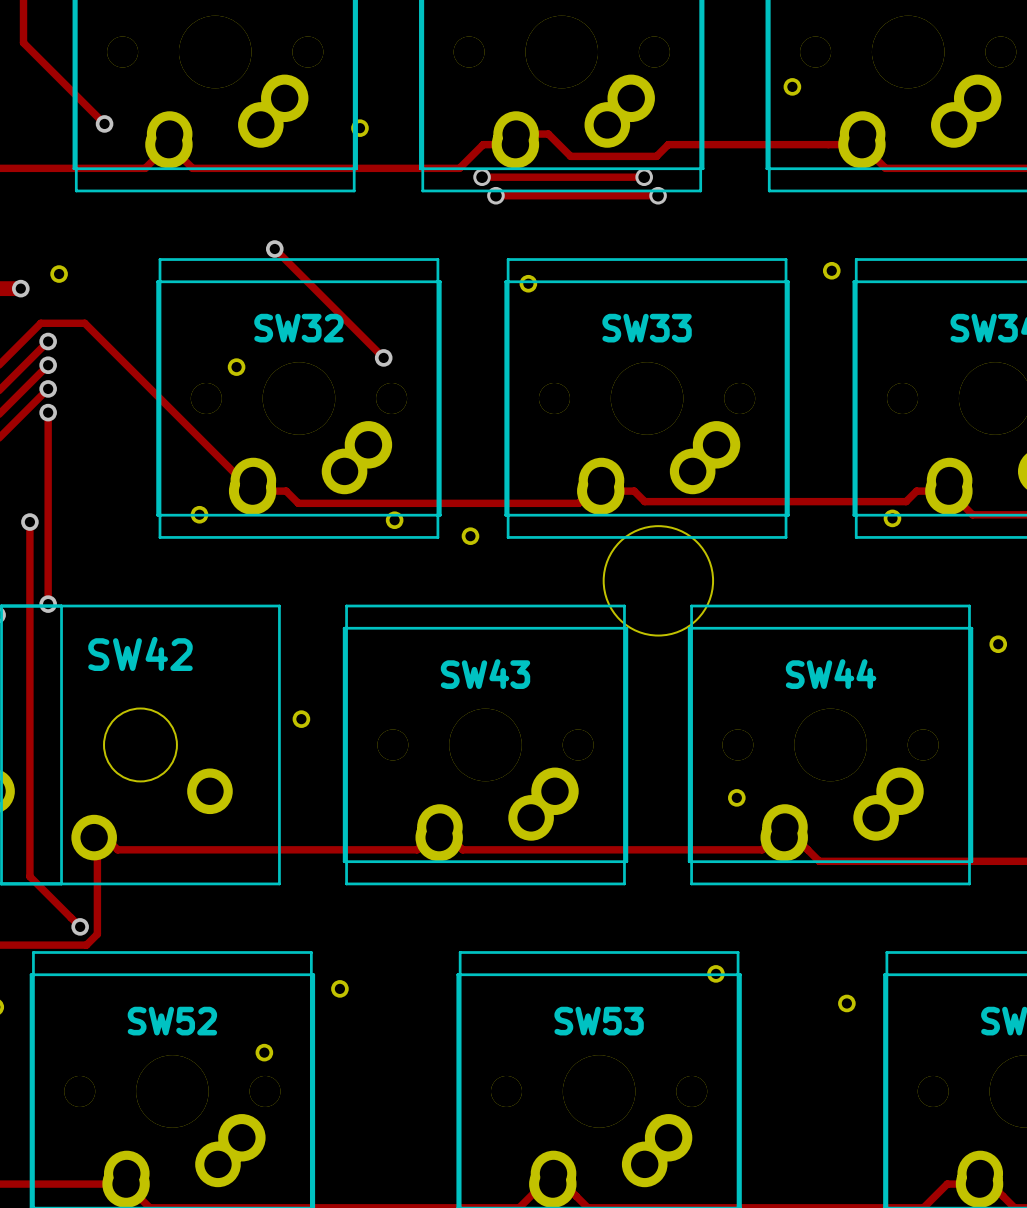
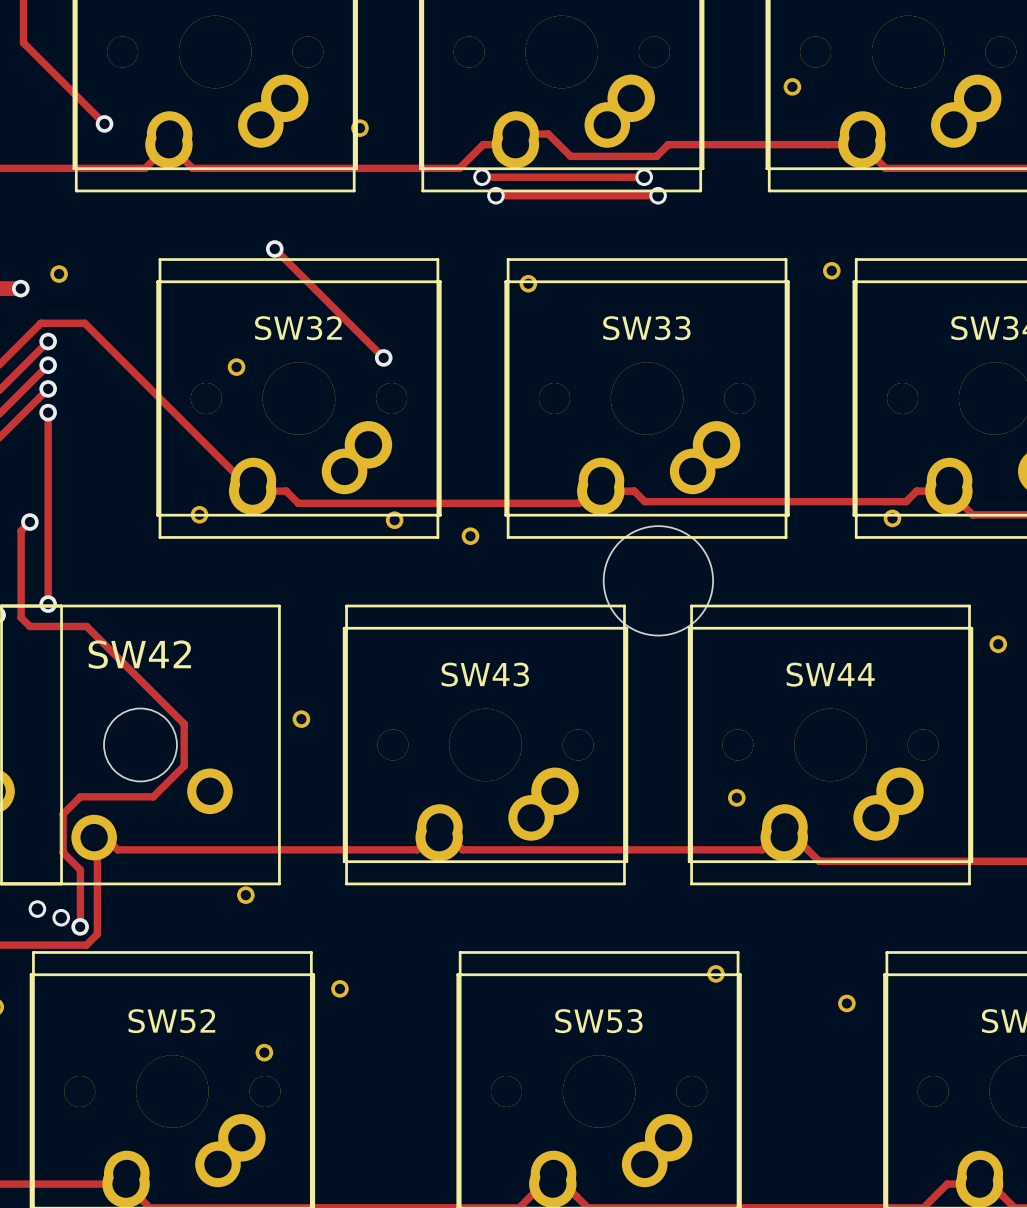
track: (29, 522) (29, 876) (80, 926) -> (29, 522) (21, 530) (21, 617) (29, 626) (86, 626) (184, 723) (184, 765) (153, 796) (80, 796) (63, 814) (63, 852) (80, 869) (80, 927)
part: none -> (245, 895)
via: none -> (37, 909)
via: none -> (61, 917)

